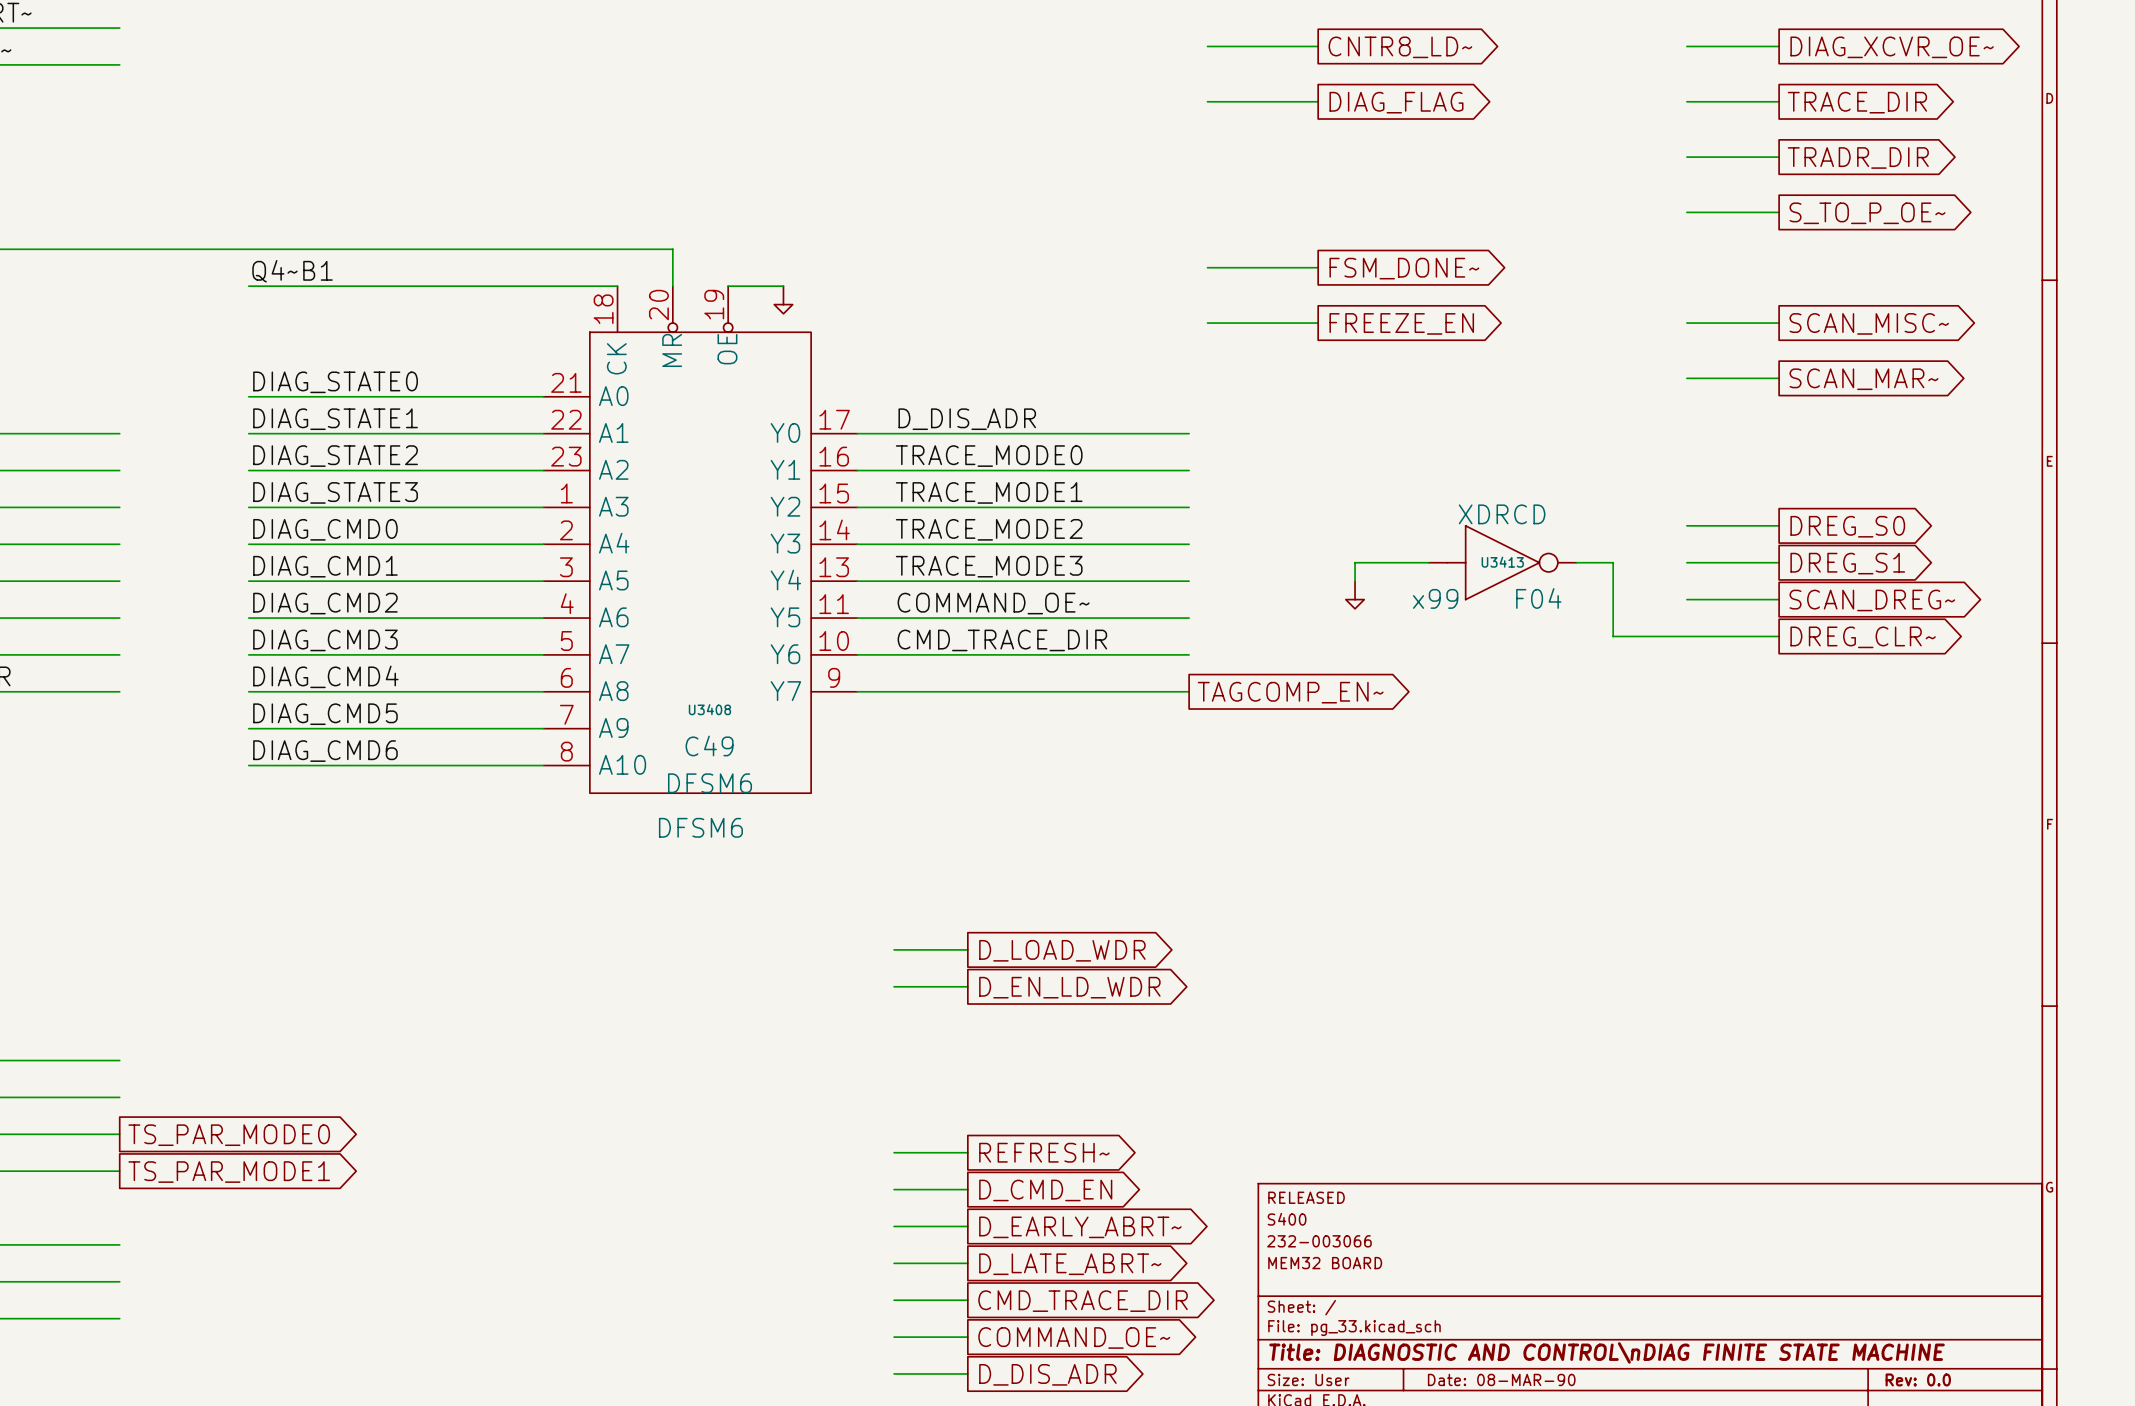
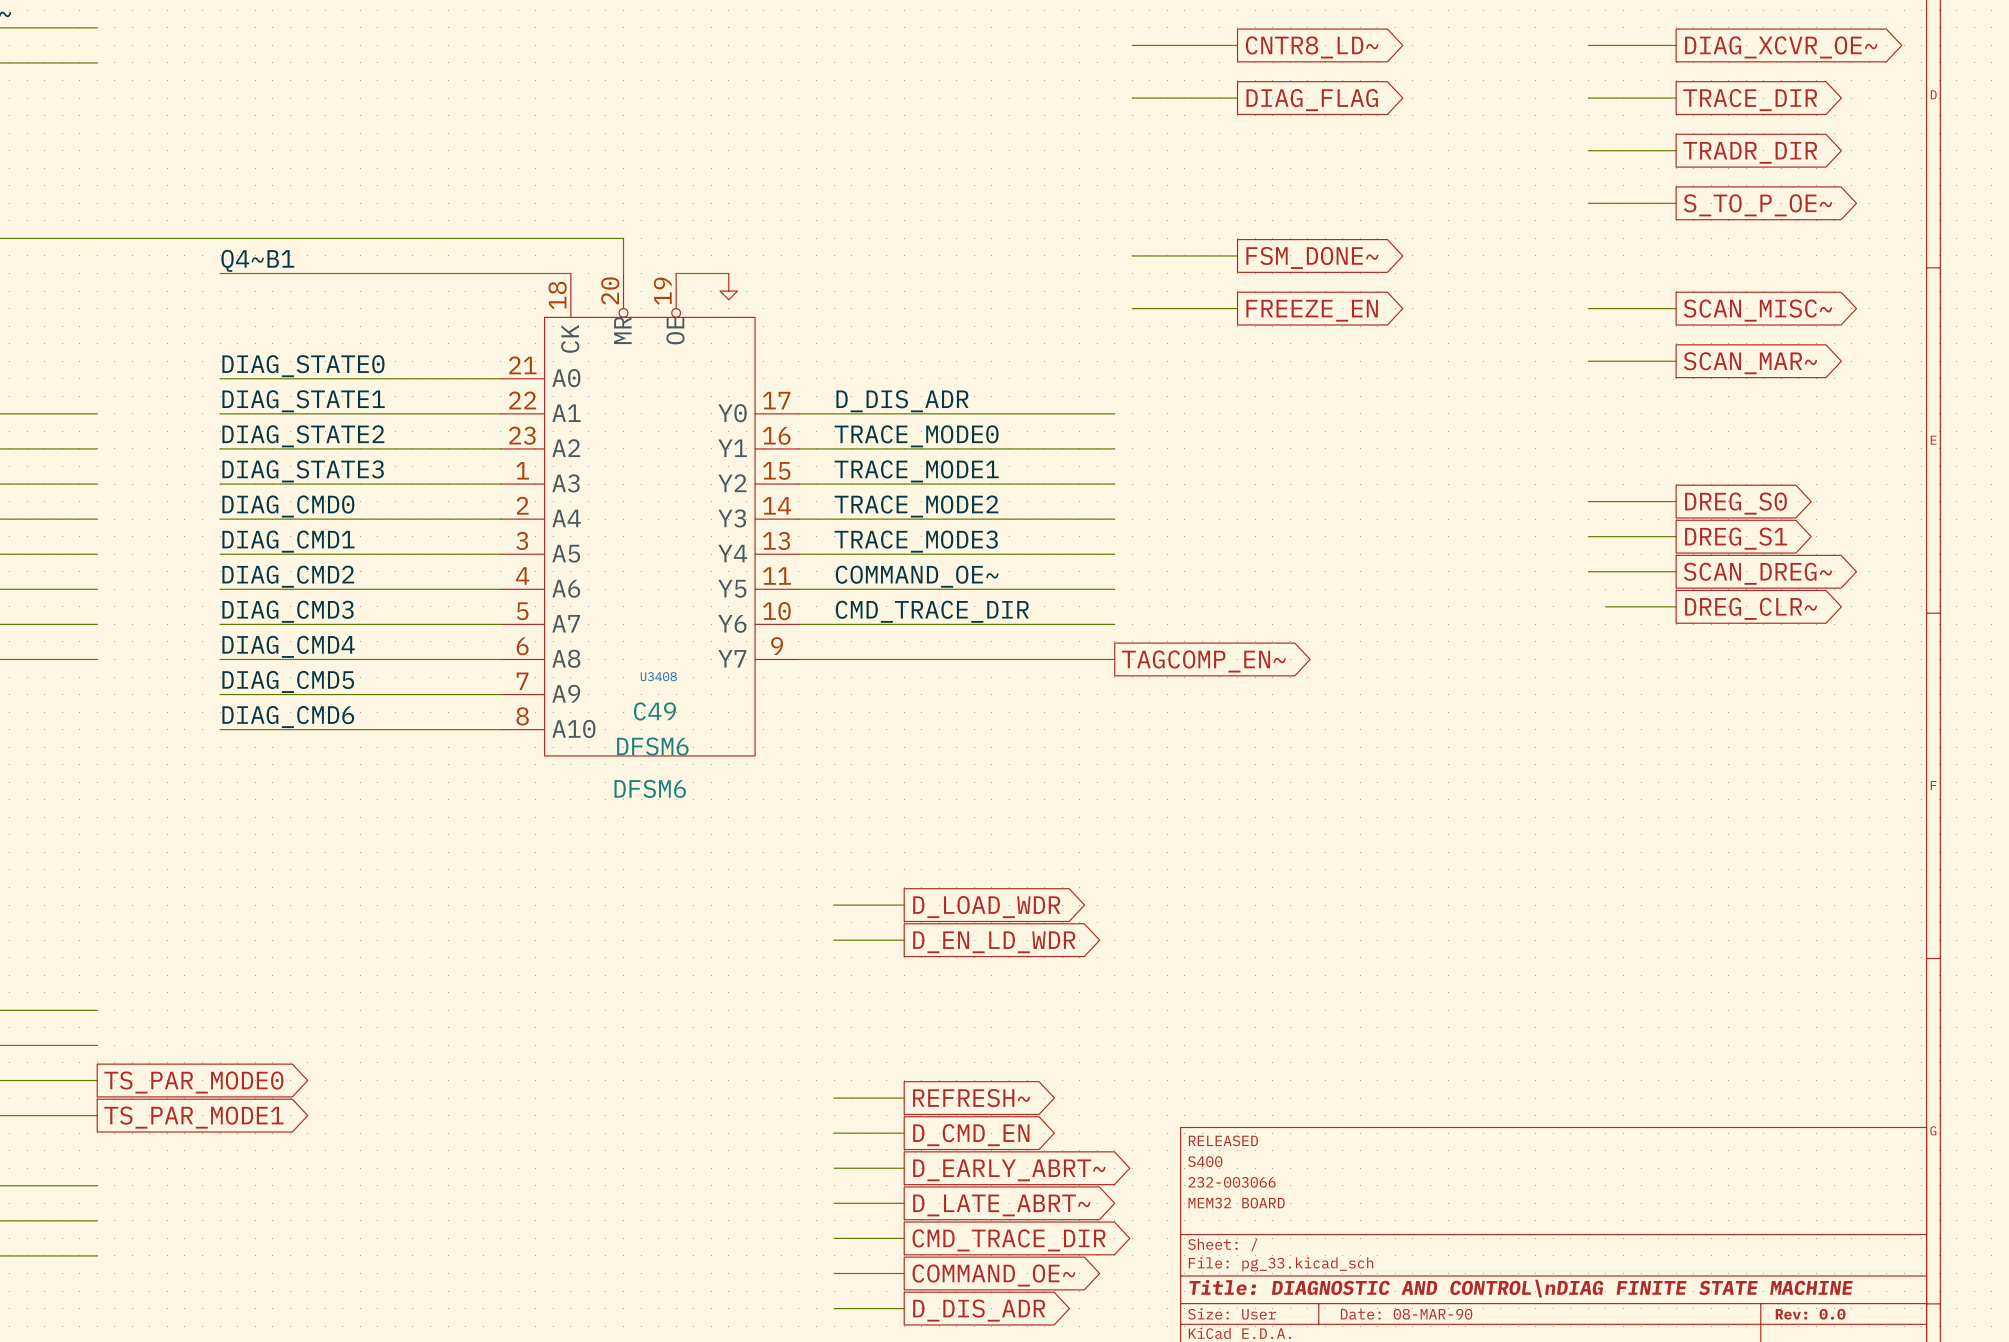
wire: (1428, 562) (1355, 562) (1355, 581) -> none
U3413: F04 (1502, 562) -> none
wire: (1576, 562) (1613, 562) (1613, 636) (1705, 636) -> none
power symbol: (1355, 595) -> none

